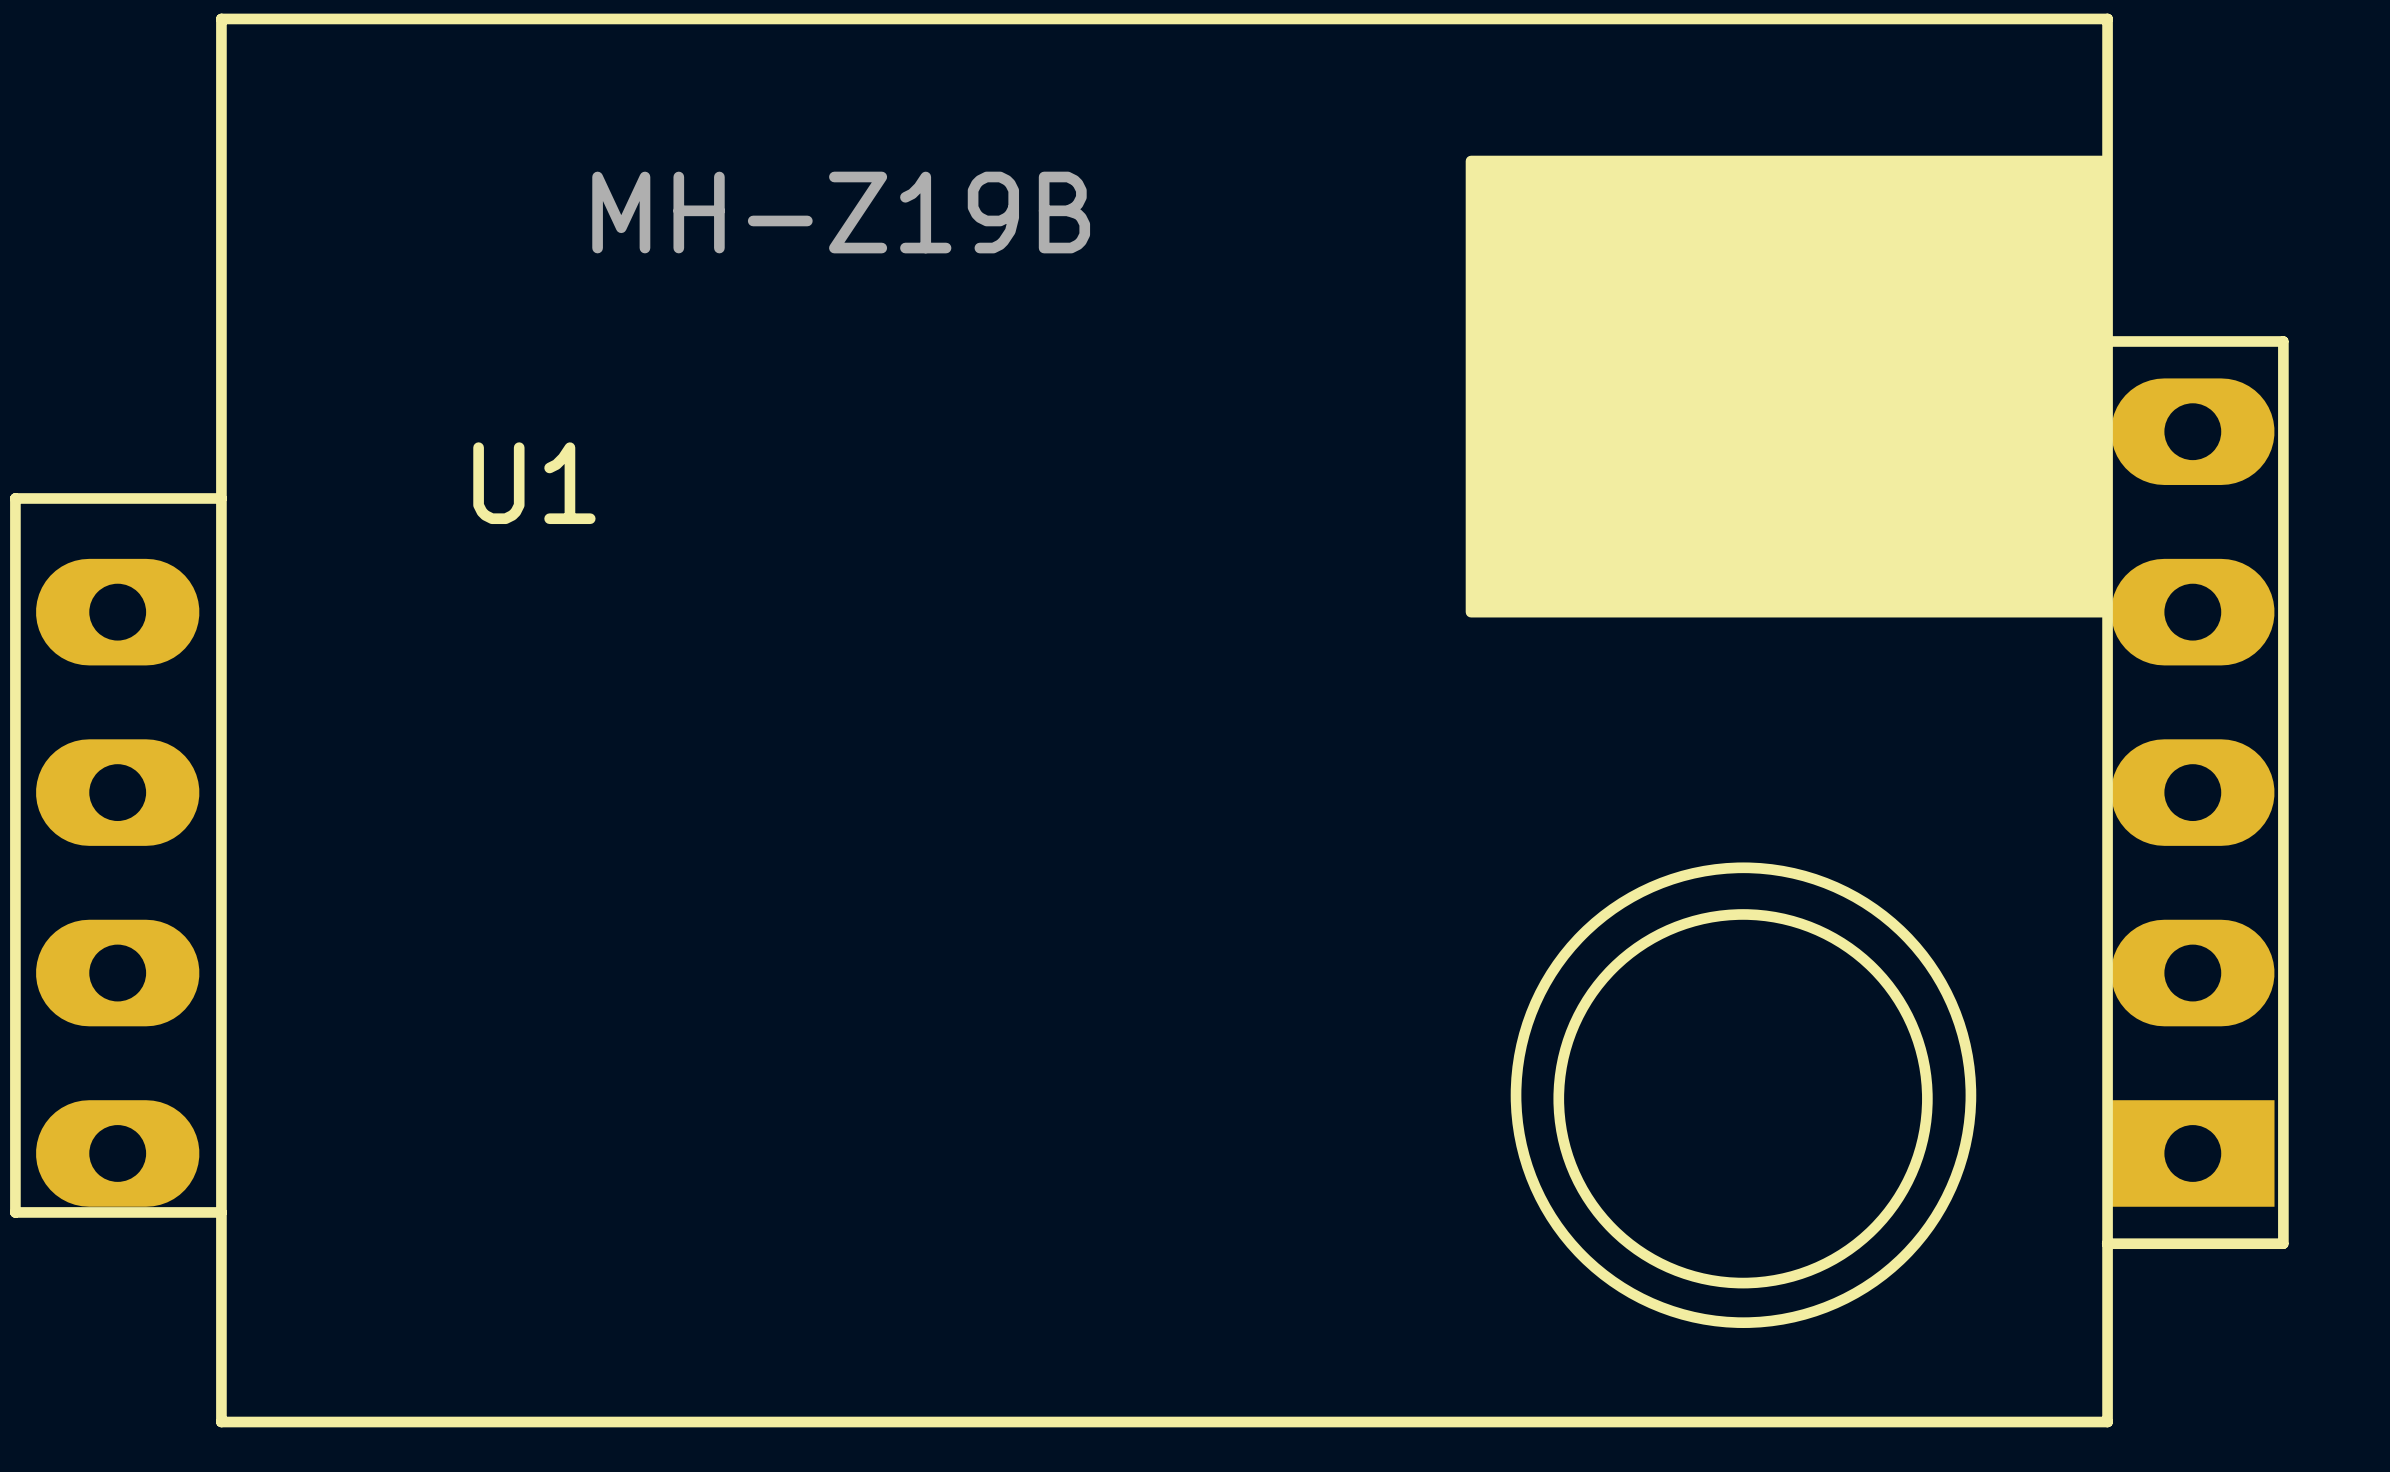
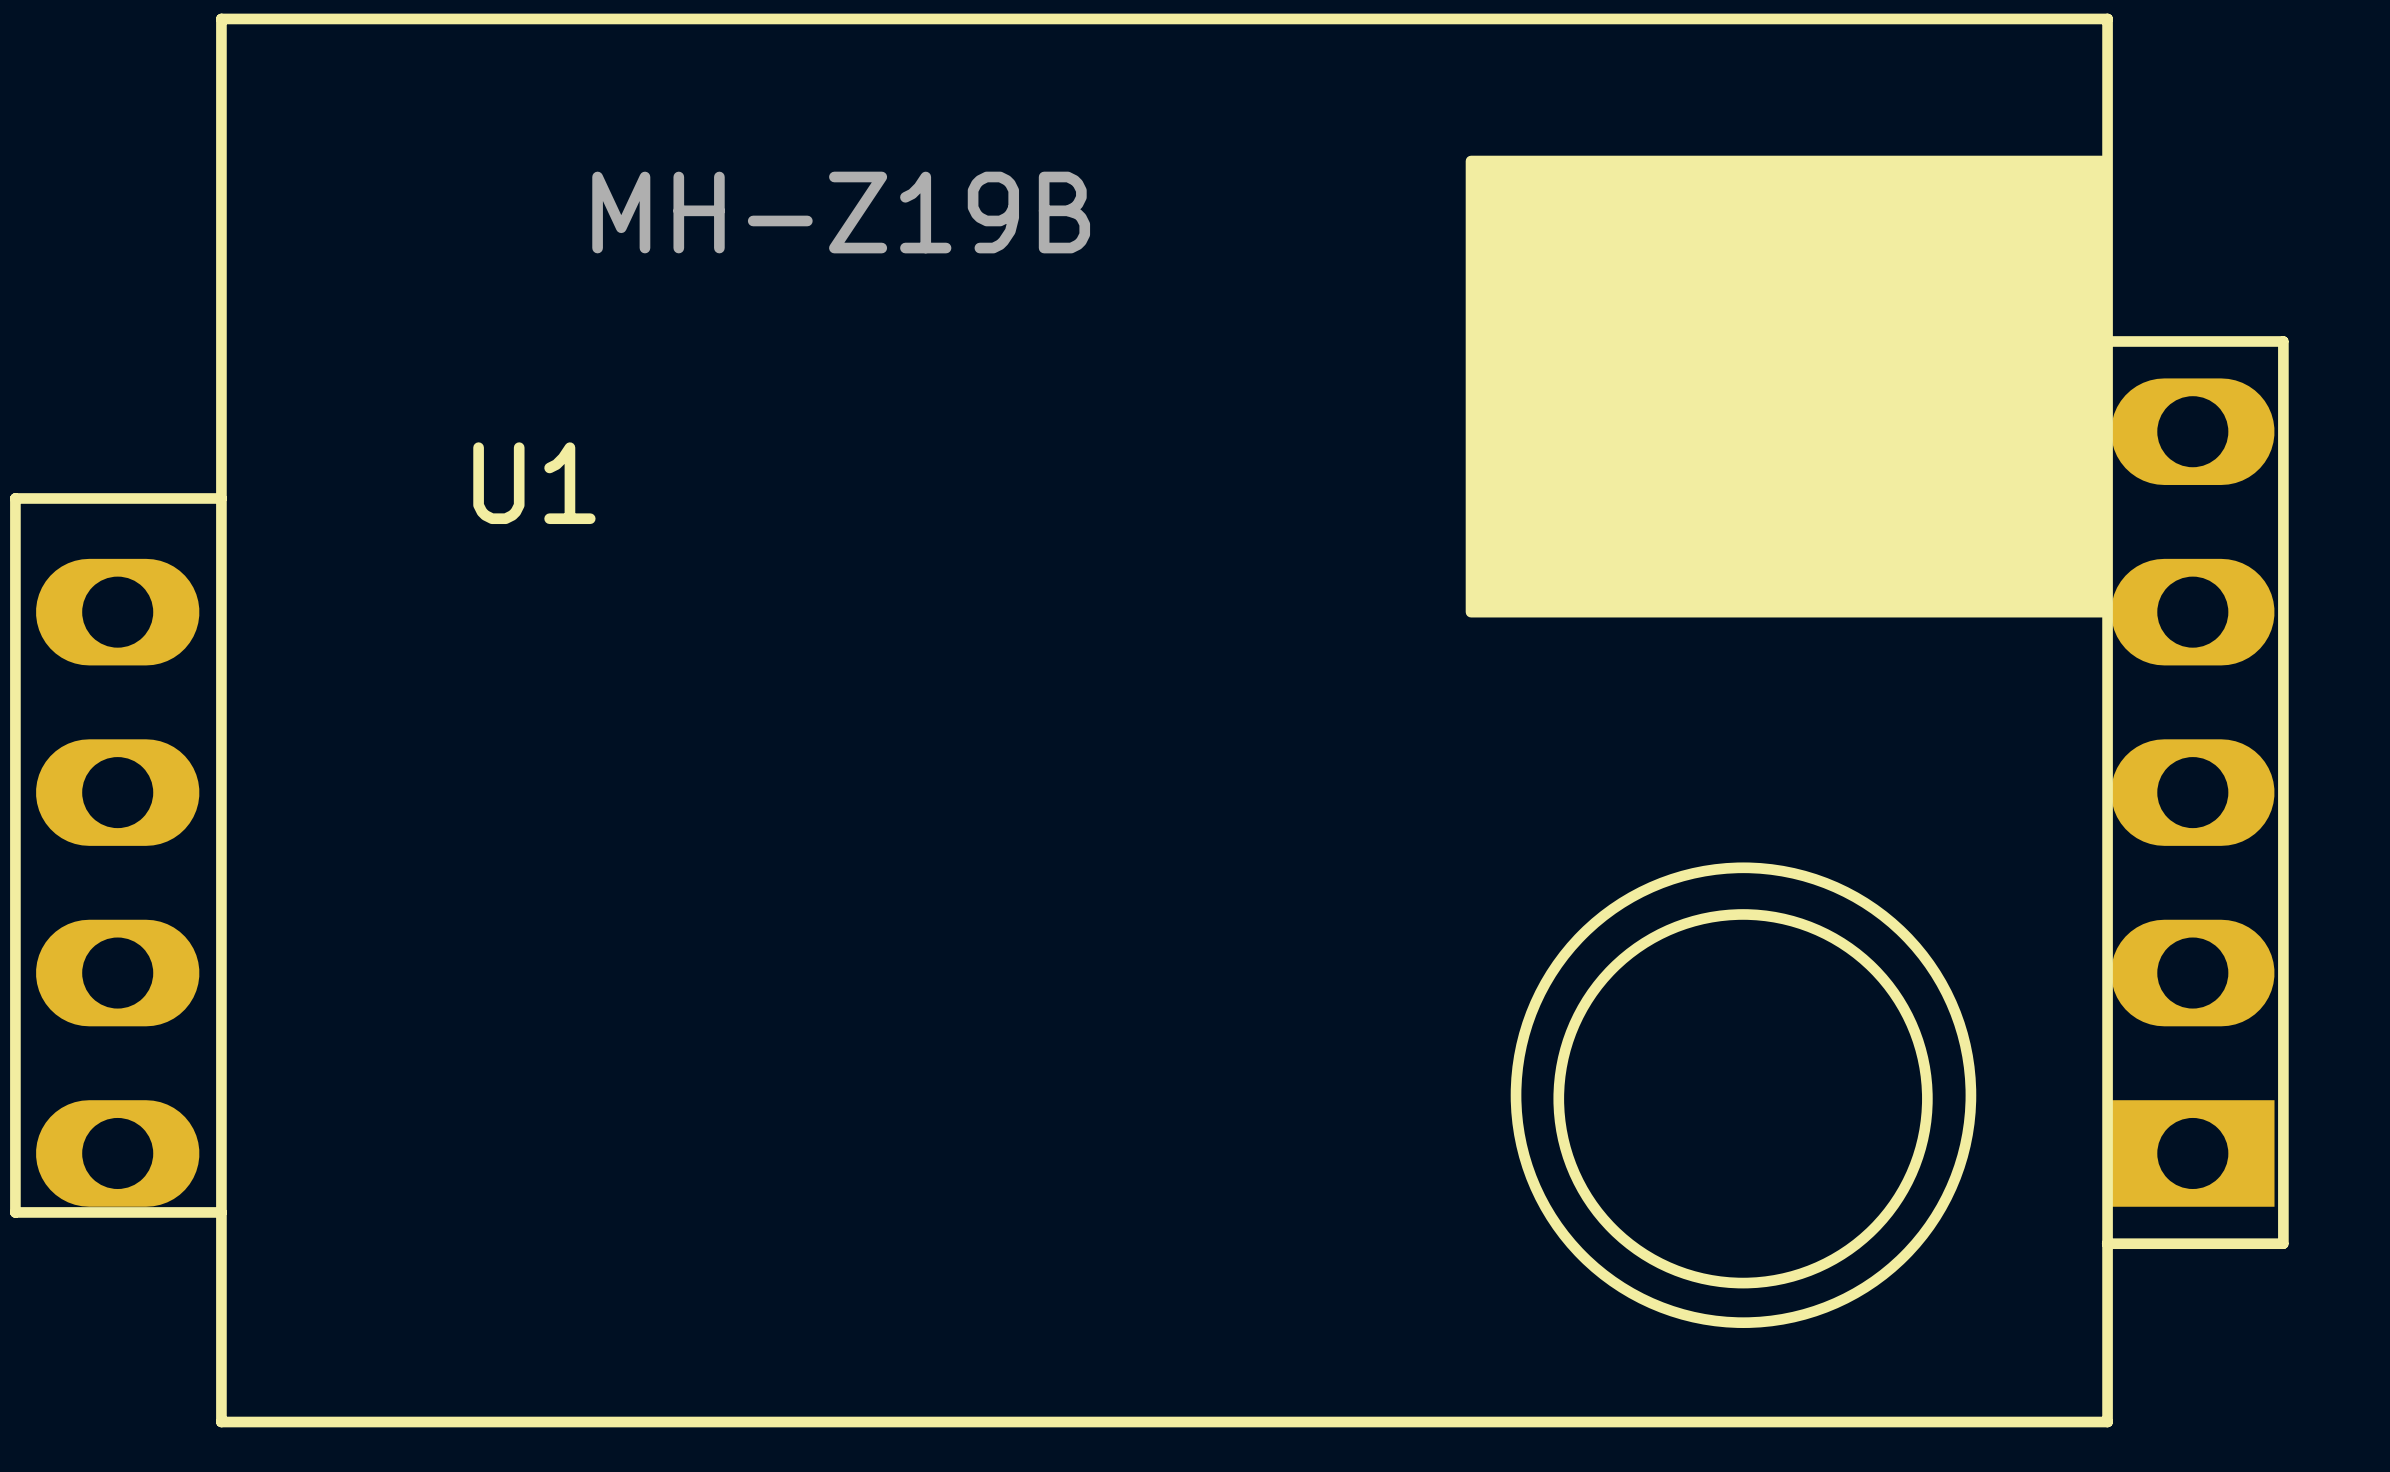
U1 footprint: [10, 13, 2289, 1428] -> [10, 13, 2289, 1428]

